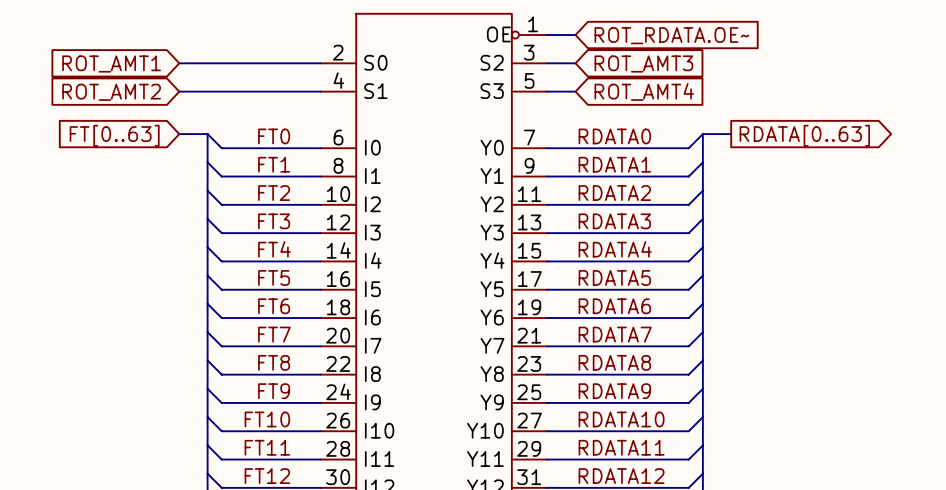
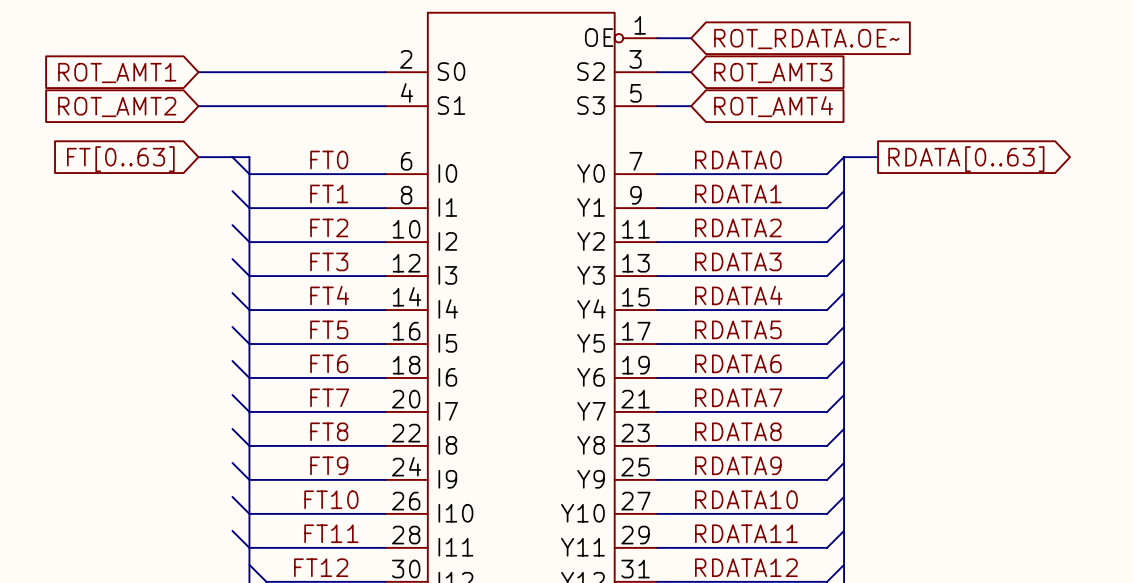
global label position: ROT_AMT1 (111, 63) -> ROT_AMT1 (117, 73)
wire: none -> (198, 72) (215, 72)
wire: none -> (198, 106) (215, 106)
global label position: ROT_AMT2 (111, 92) -> ROT_AMT2 (117, 106)
bus: none -> (198, 157) (215, 157)
wire: (207, 134) (221, 148) -> (232, 157) (249, 174) (266, 174)
global label position: FT[0..63] (114, 135) -> FT[0..63] (120, 159)
wire: (207, 162) (221, 176) -> (232, 191) (249, 208) (266, 208)
wire: (207, 190) (221, 204) -> (232, 225) (249, 242) (266, 242)
wire: (207, 218) (221, 233) -> (232, 259) (249, 276) (266, 276)
wire: (207, 247) (221, 261) -> (232, 293) (249, 310) (266, 310)
wire: (207, 275) (221, 289) -> (232, 327) (249, 344) (266, 344)
wire: (207, 303) (221, 318) -> (232, 361) (249, 377) (266, 377)
wire: (207, 332) (221, 346) -> (232, 394) (249, 411) (266, 411)
wire: (207, 360) (221, 374) -> (232, 428) (249, 445) (266, 445)
wire: (207, 388) (221, 402) -> (232, 462) (249, 479) (266, 479)
wire: (207, 417) (221, 431) -> (232, 496) (249, 513) (266, 513)
label position: FT10 (267, 419) -> FT10 (331, 499)
wire: (207, 445) (221, 459) -> (232, 530) (249, 547) (266, 547)
label position: FT11 (267, 447) -> FT11 (331, 533)

